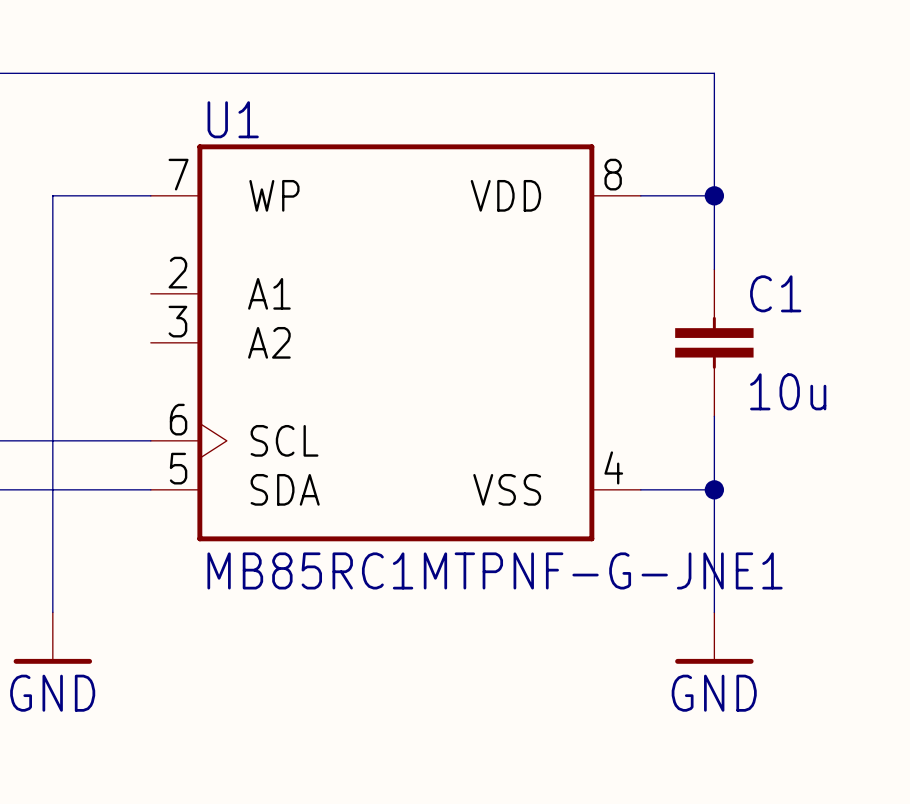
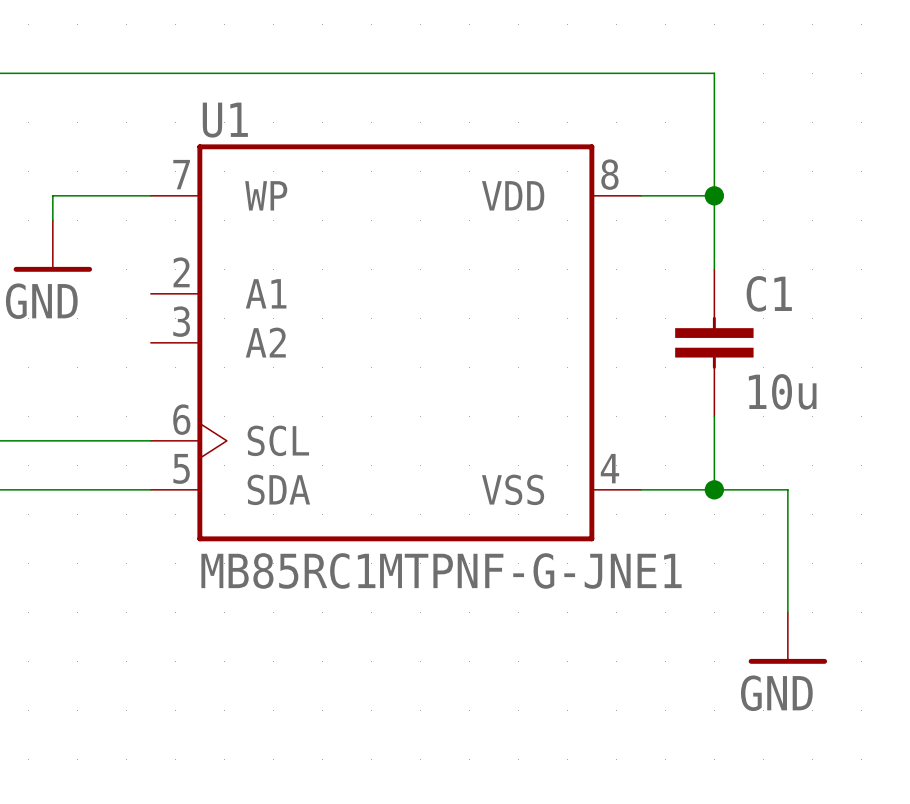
wire: (52, 220) (52, 612) -> none
power symbol: none -> GND (52, 246)
wire: (714, 489) (714, 612) -> (714, 489) (787, 489) (787, 612)
power symbol: GND (52, 638) -> none
power symbol position: GND (714, 638) -> GND (787, 638)

